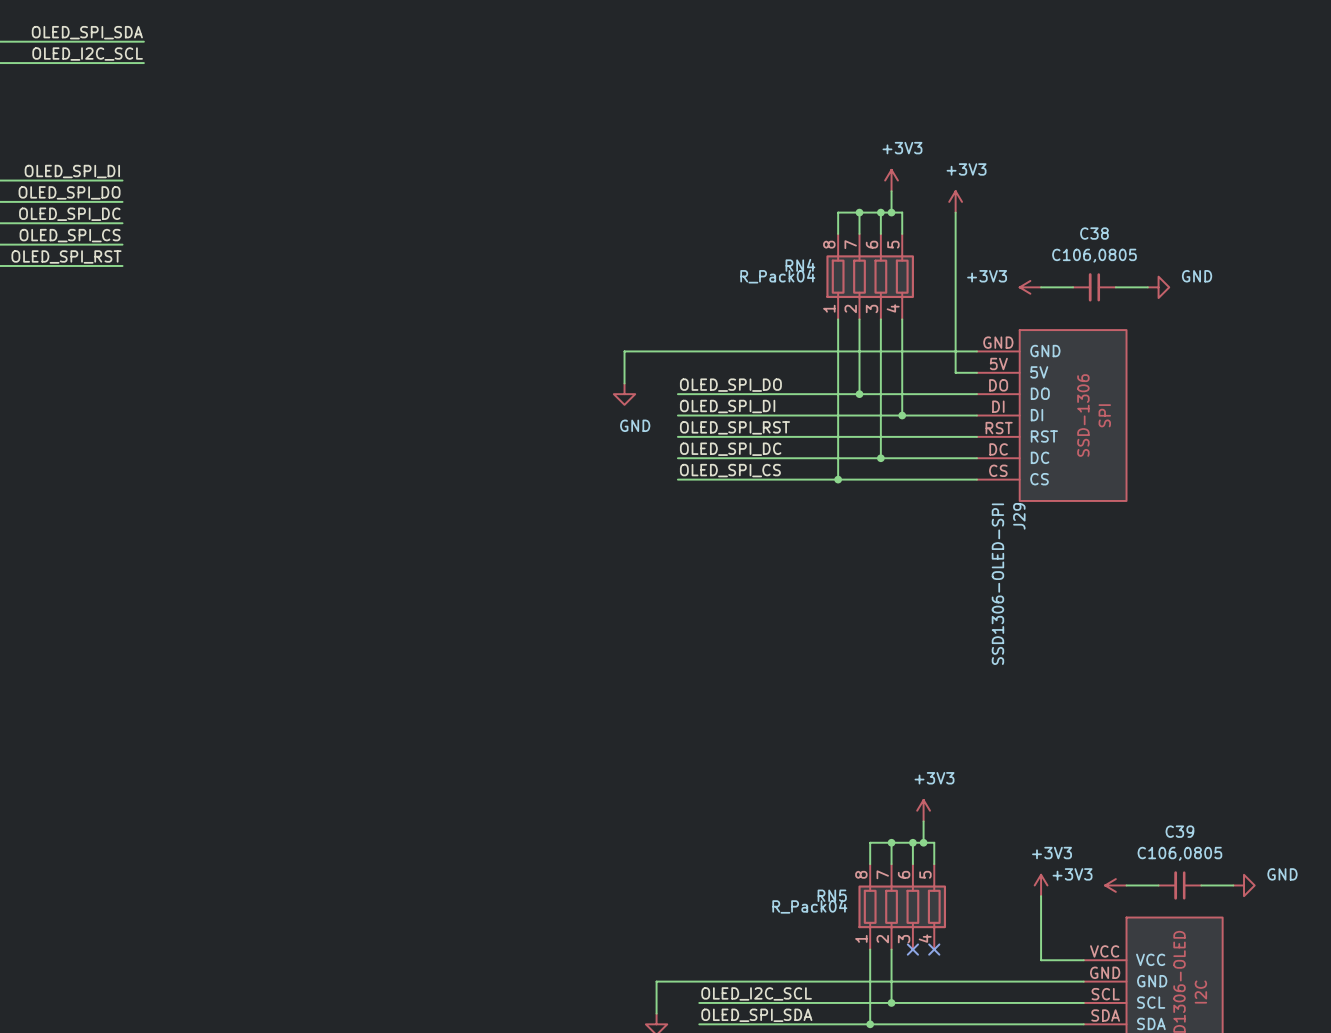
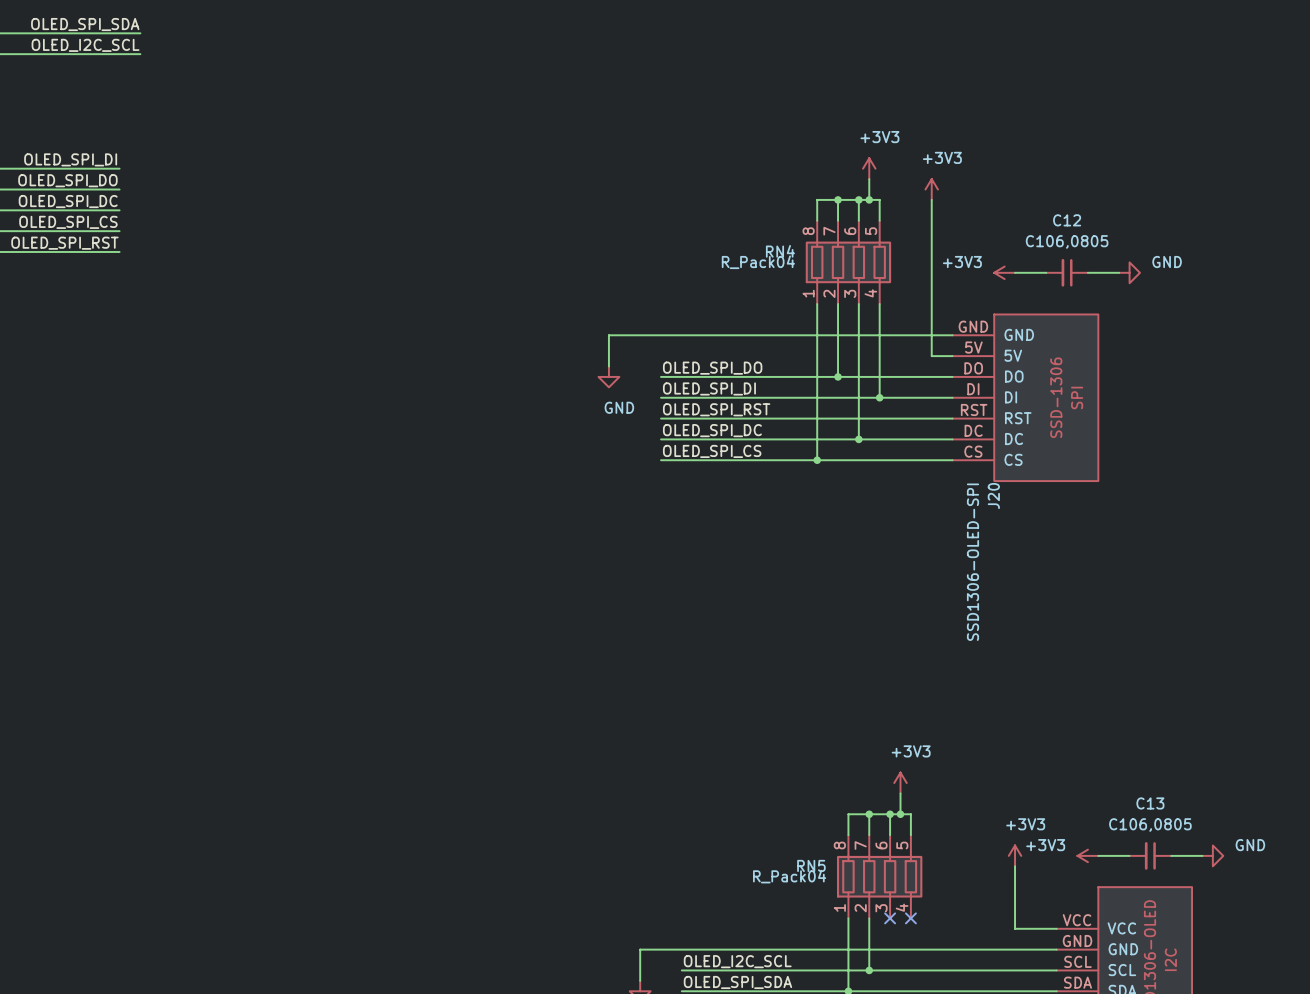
C38 name: C38 (1094, 233) -> C12 (1067, 220)
J29 name: J29 (1019, 516) -> J20 (993, 496)
C39 name: C39 (1179, 831) -> C13 (1150, 803)

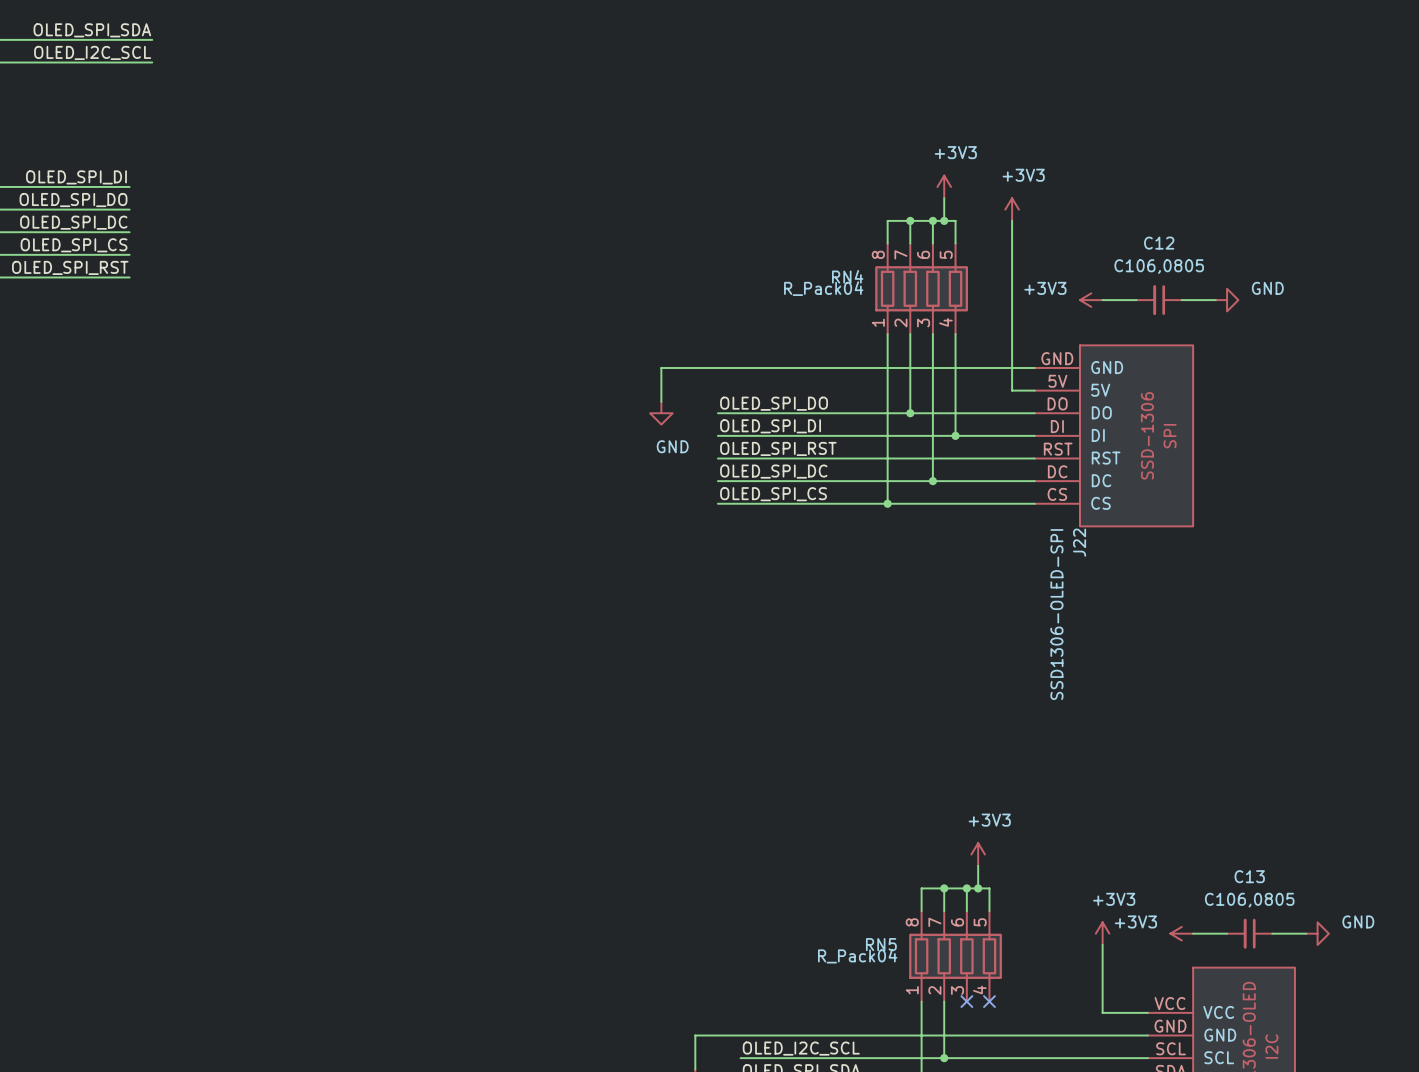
J20 name: J20 (993, 496) -> J22 (1079, 542)

